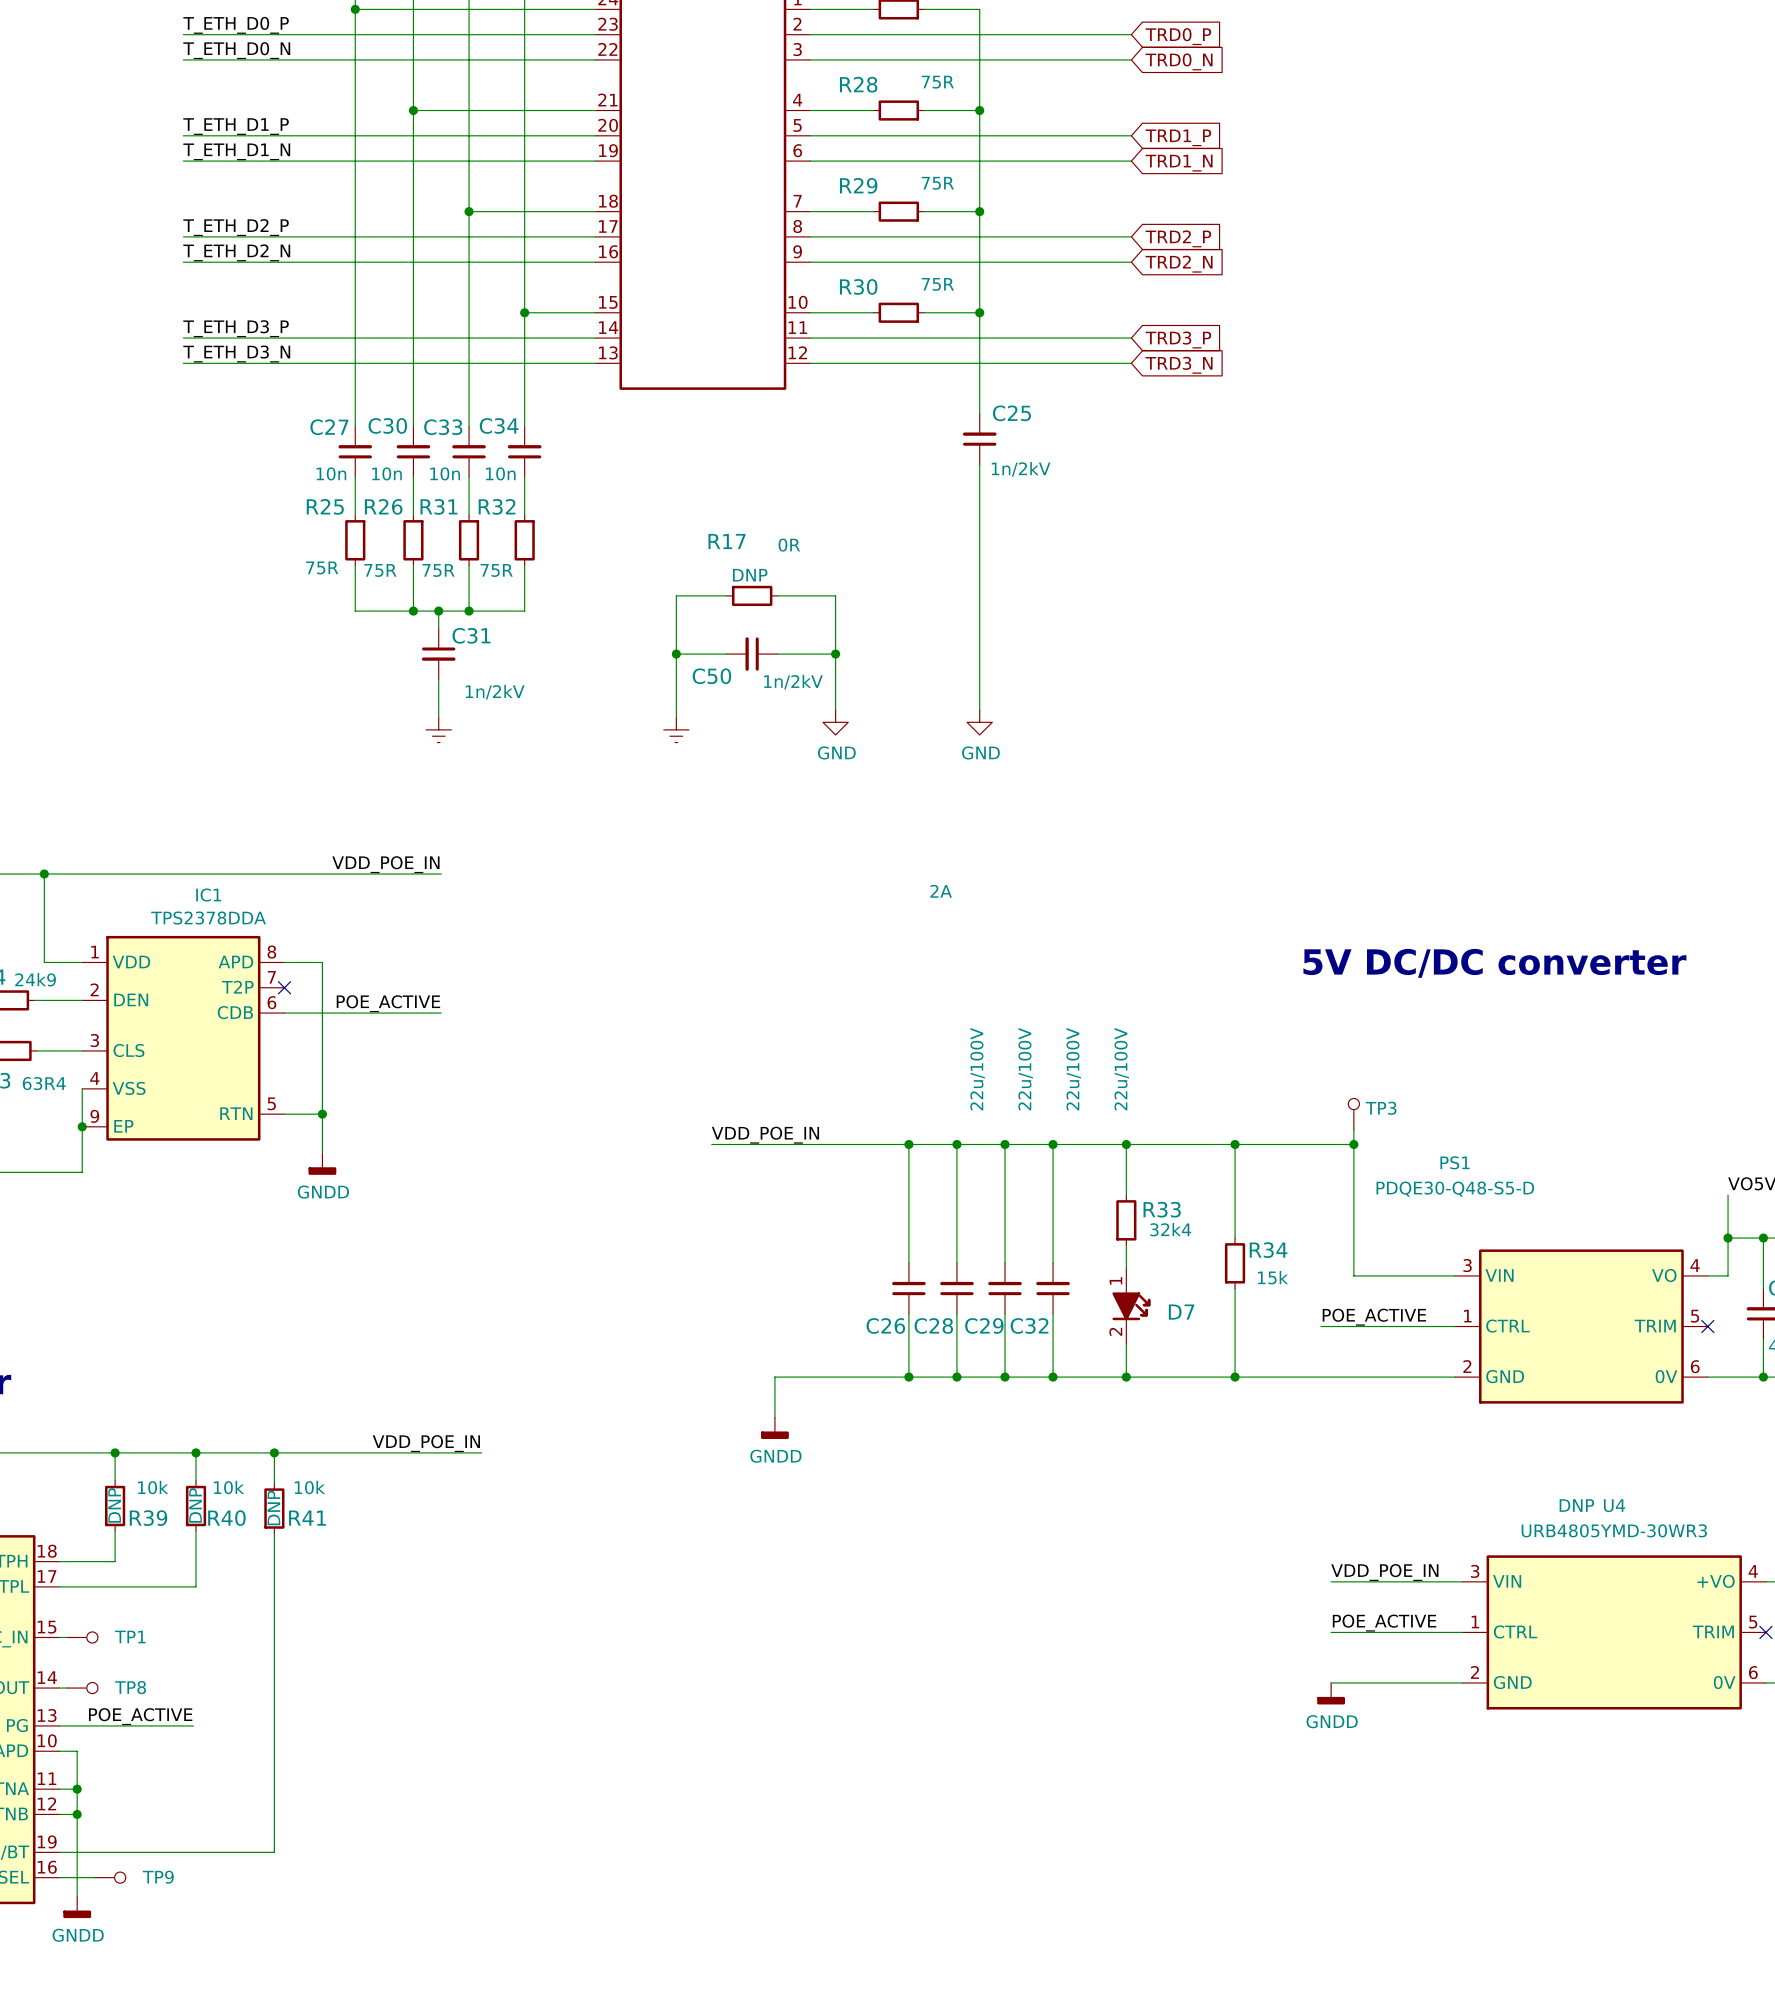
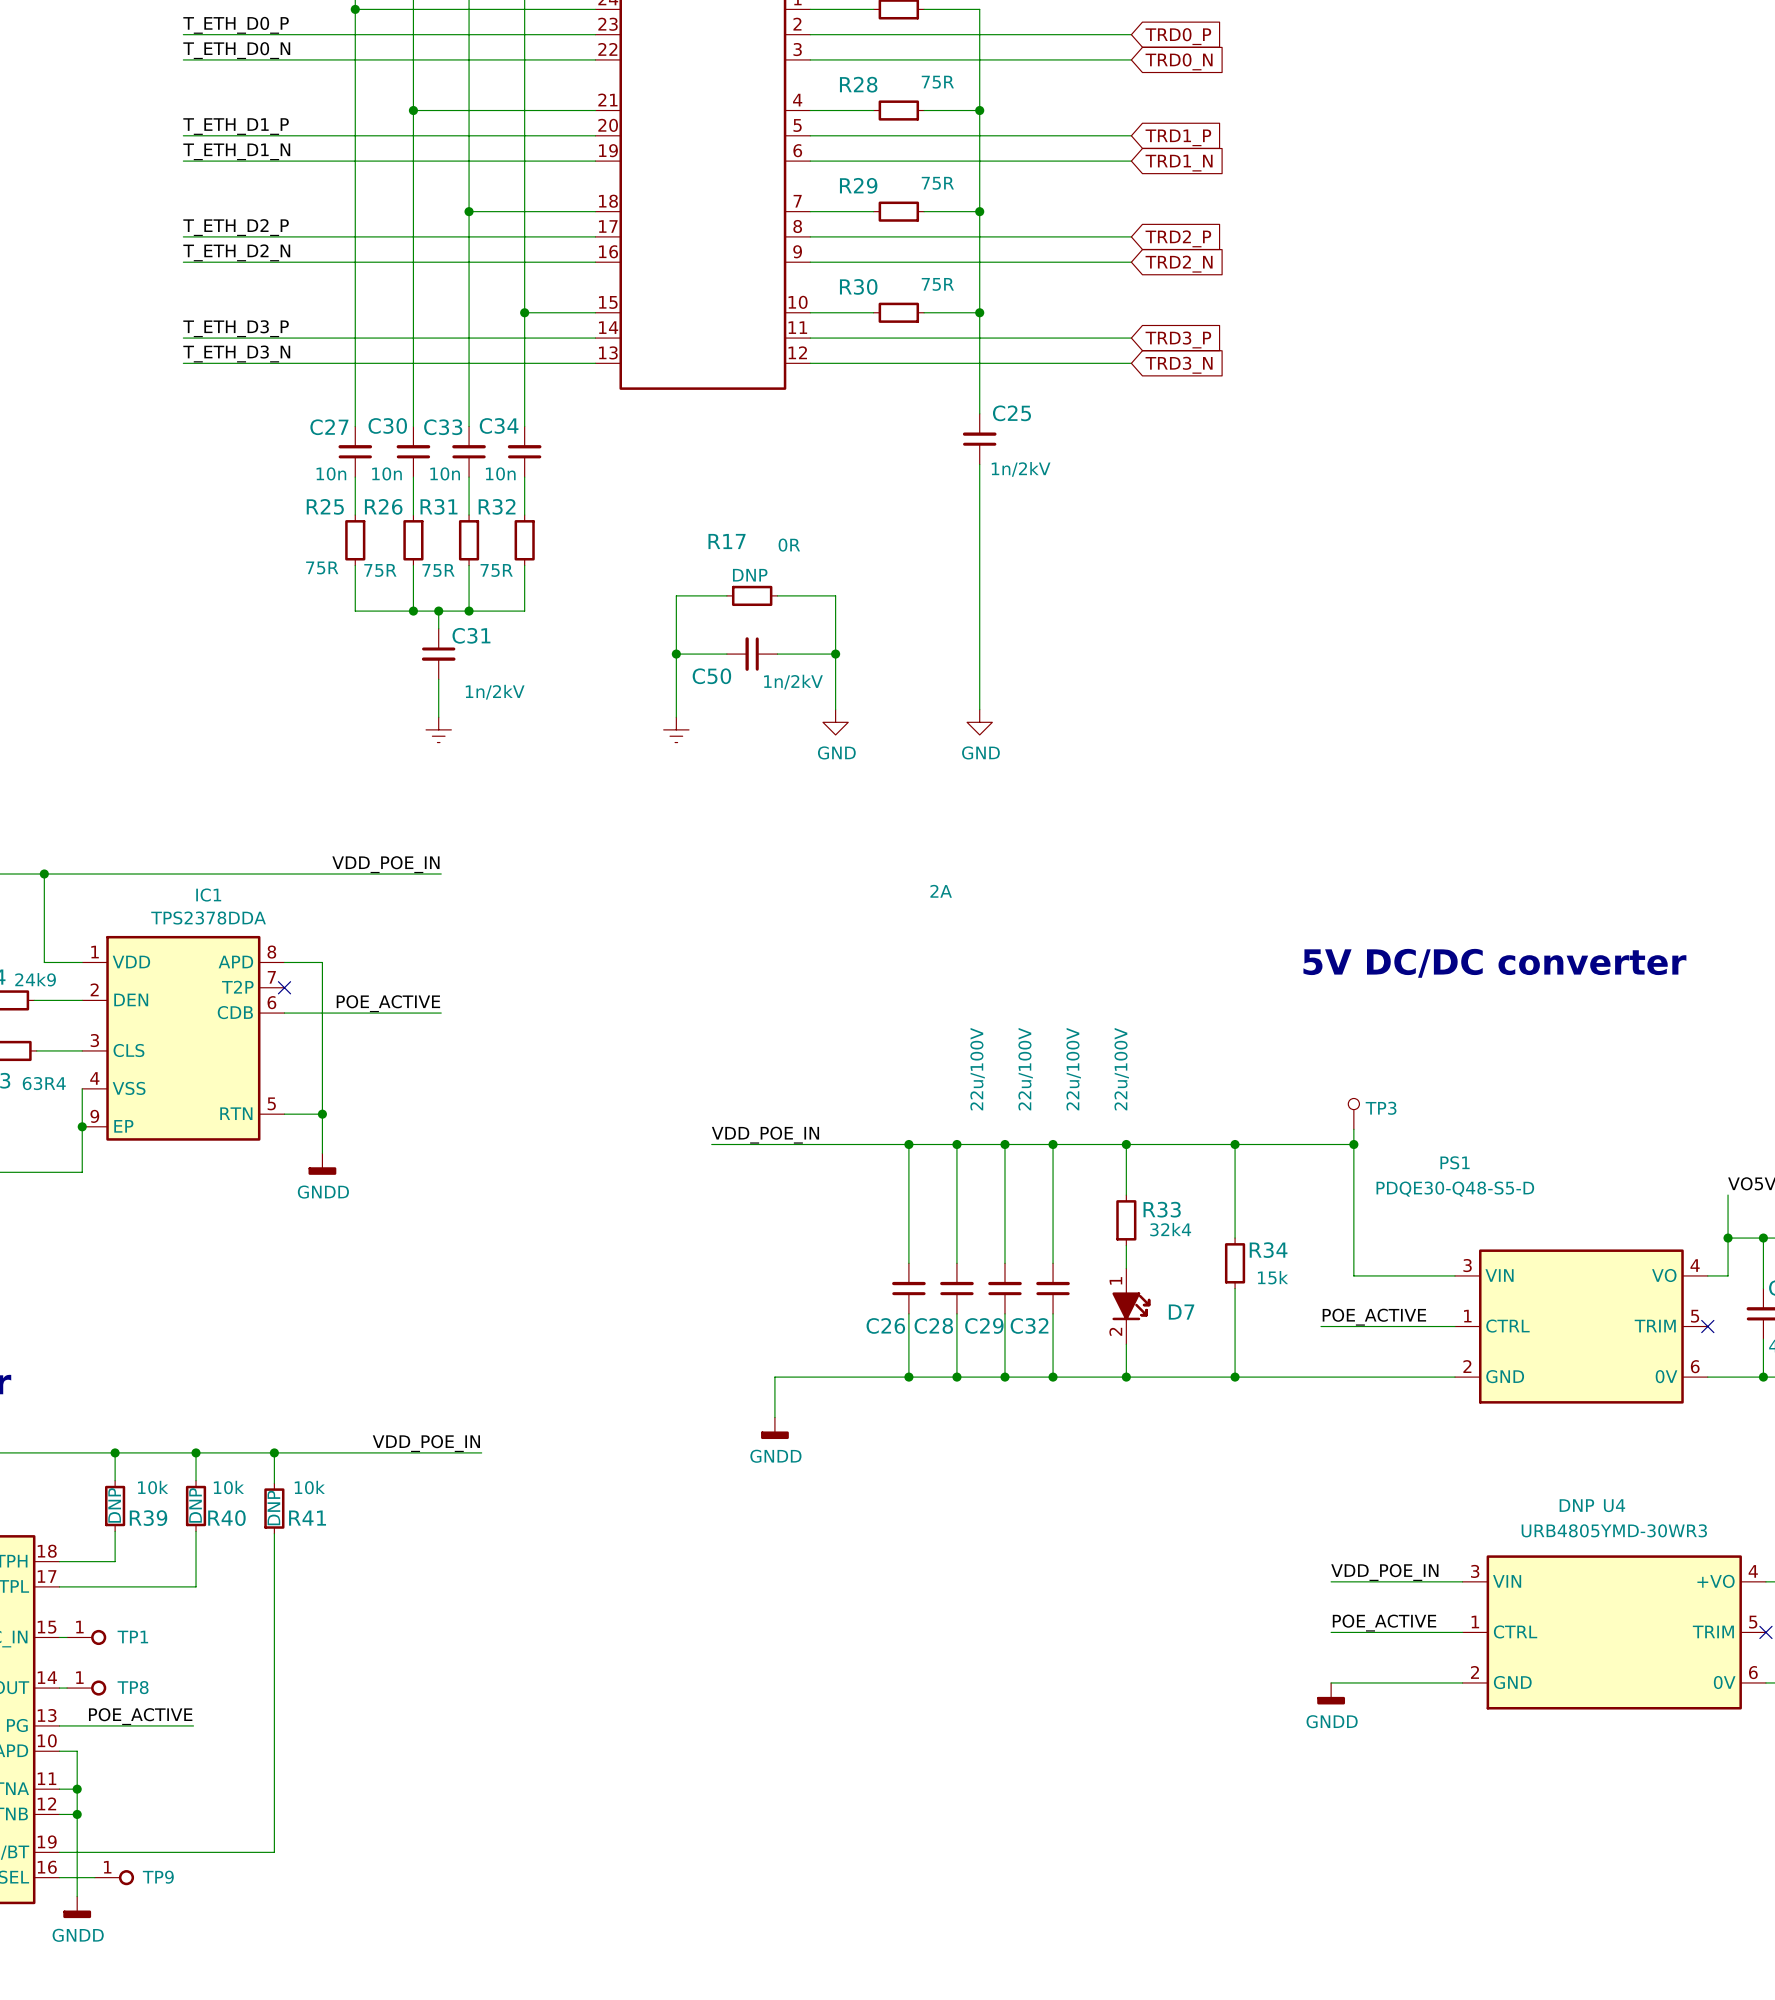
TP1 symbol: [67, 1631, 98, 1644] -> [67, 1629, 107, 1646]
TP8 symbol: [67, 1682, 98, 1694] -> [67, 1680, 107, 1696]
TP9 symbol: [94, 1872, 126, 1884] -> [94, 1870, 135, 1886]

